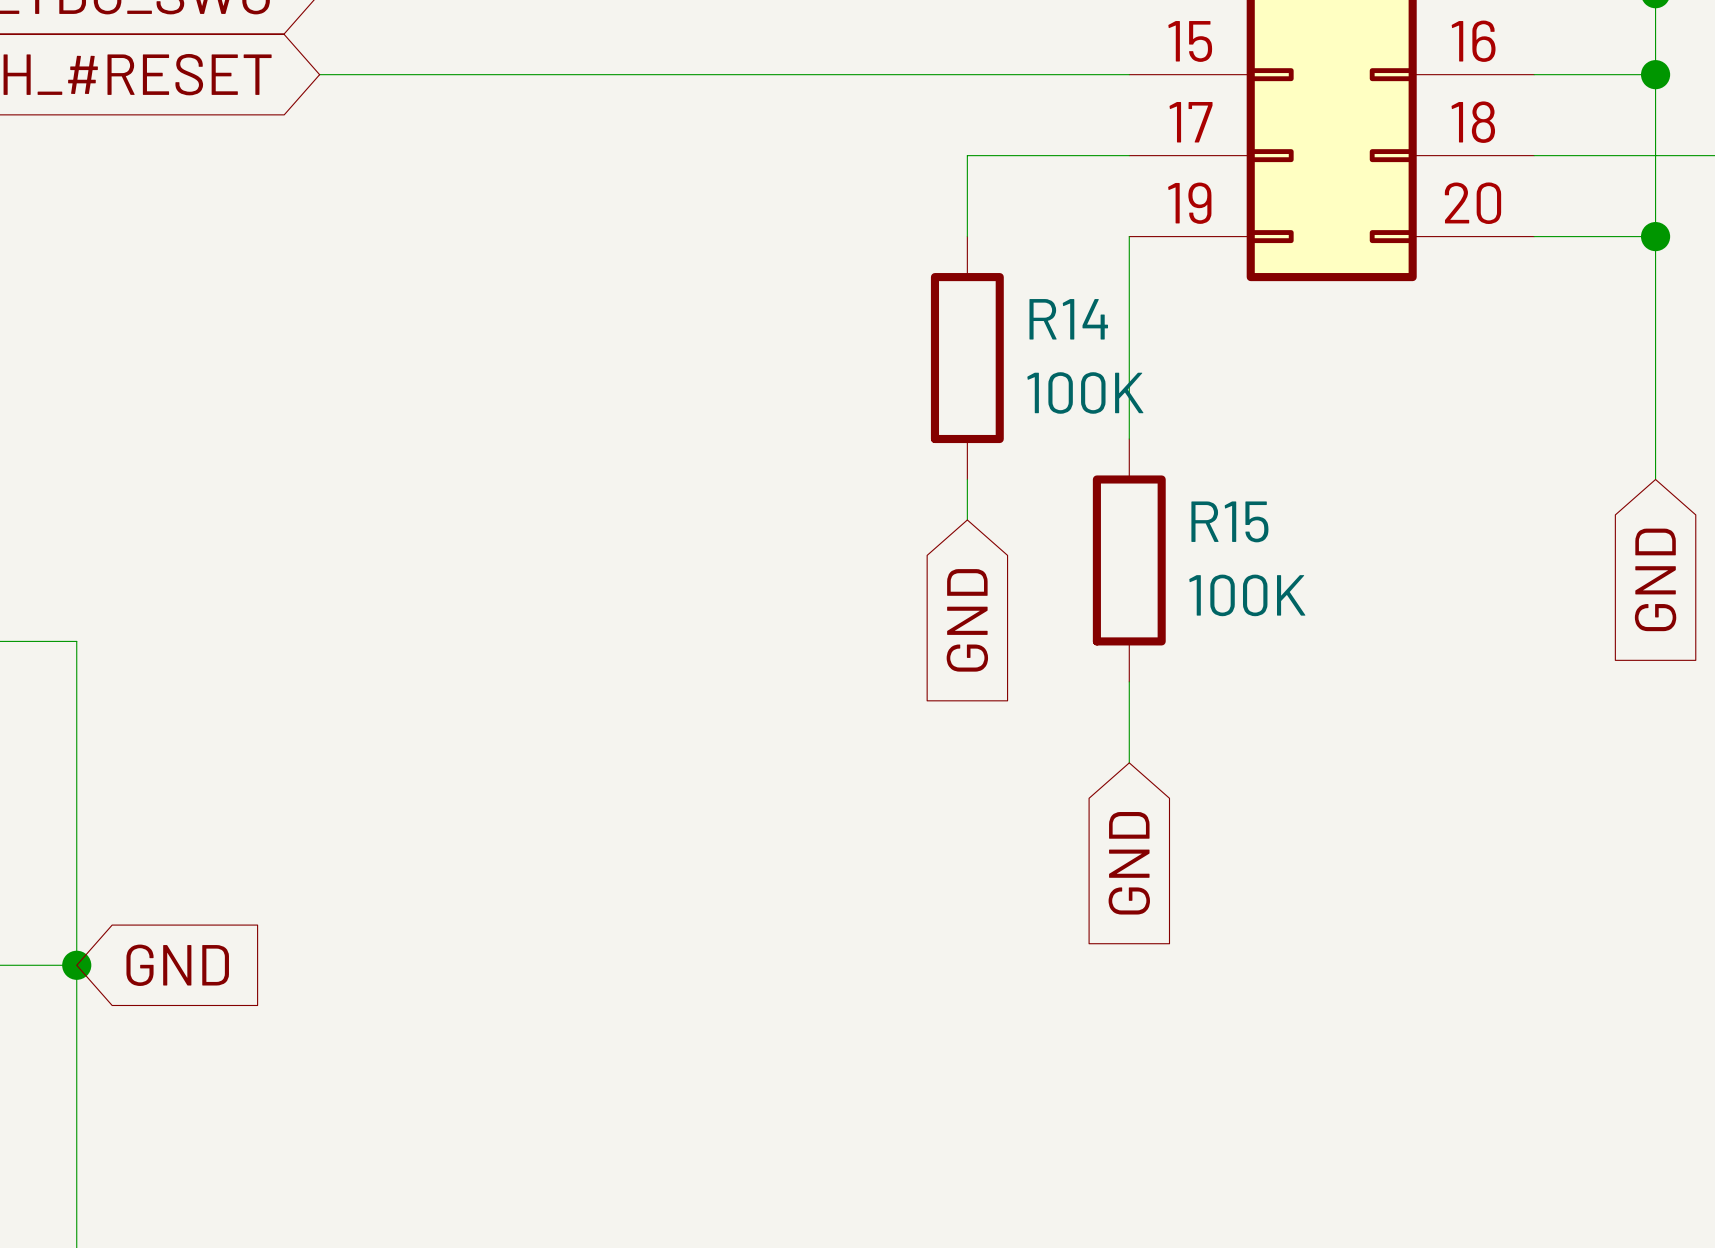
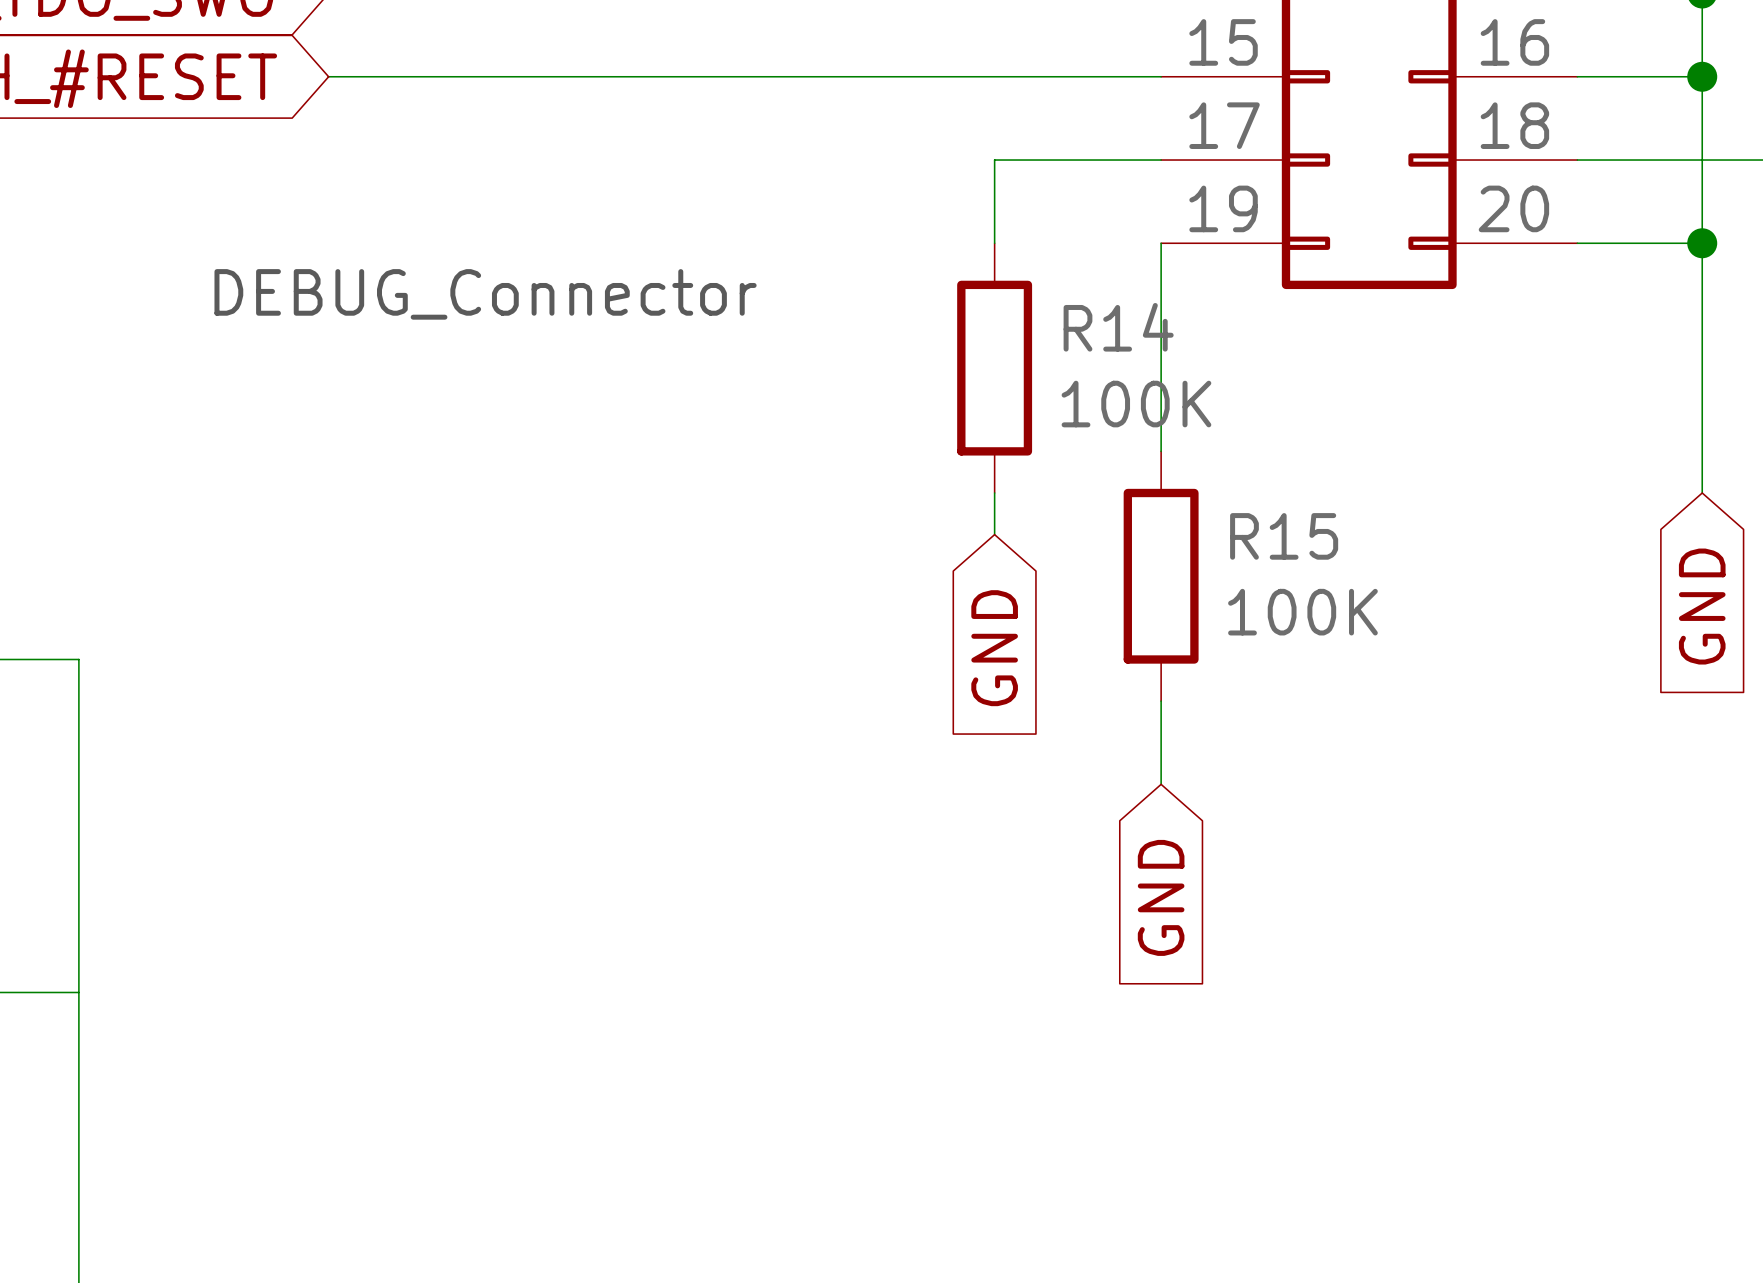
text: none -> DEBUG_Connector (485, 294)
junction: (76, 965) -> none
global label: GND (177, 965) -> none

